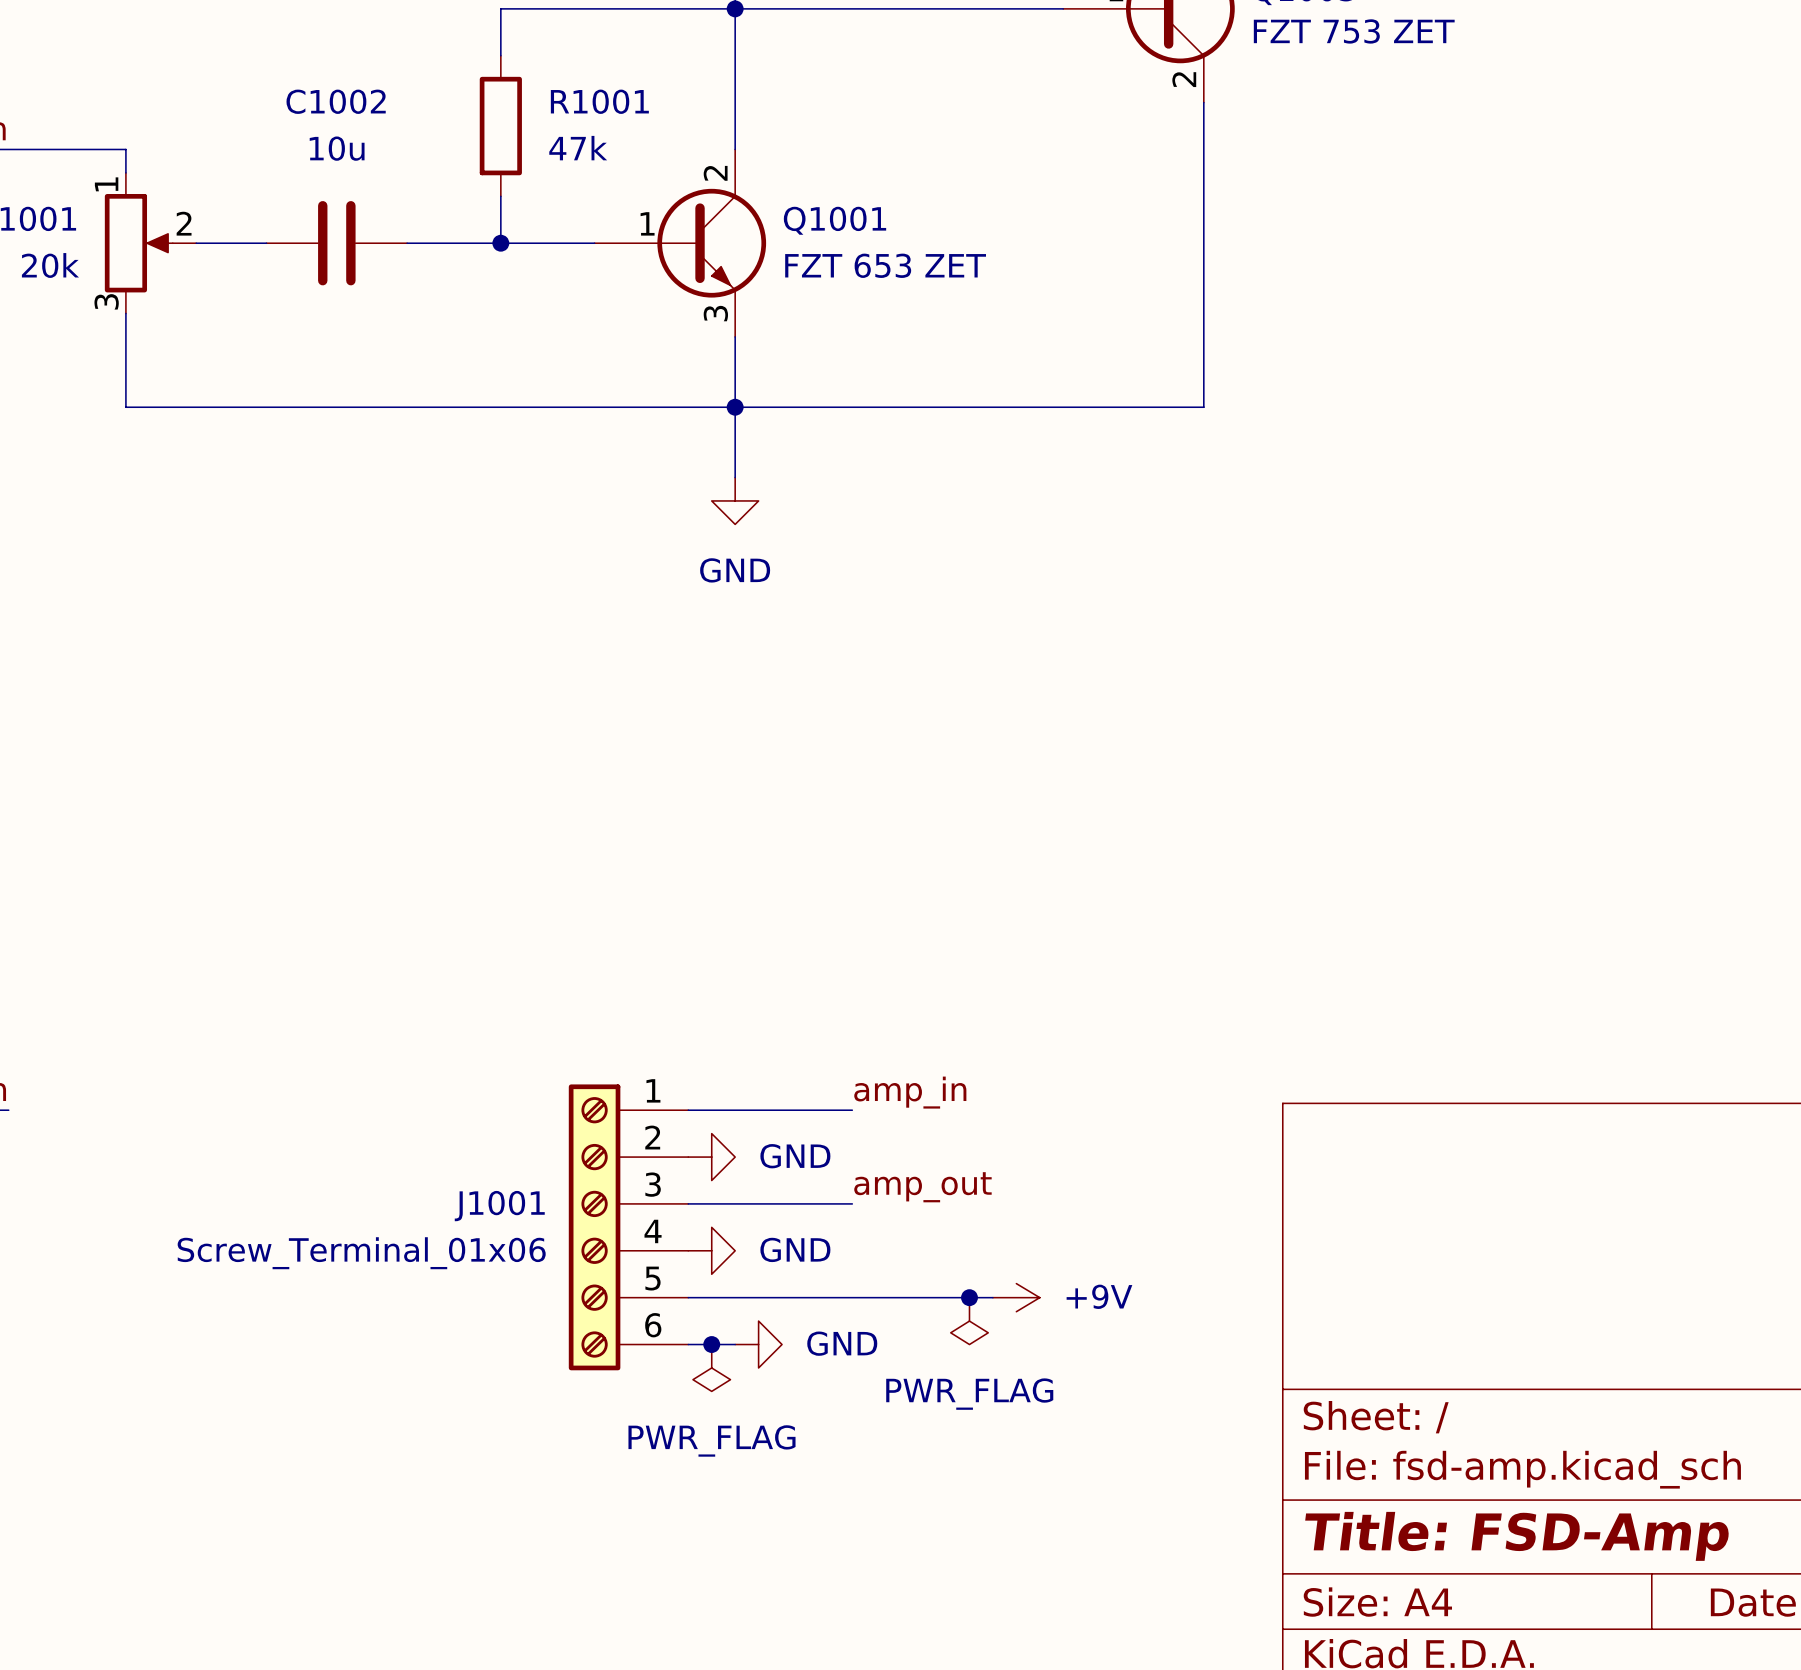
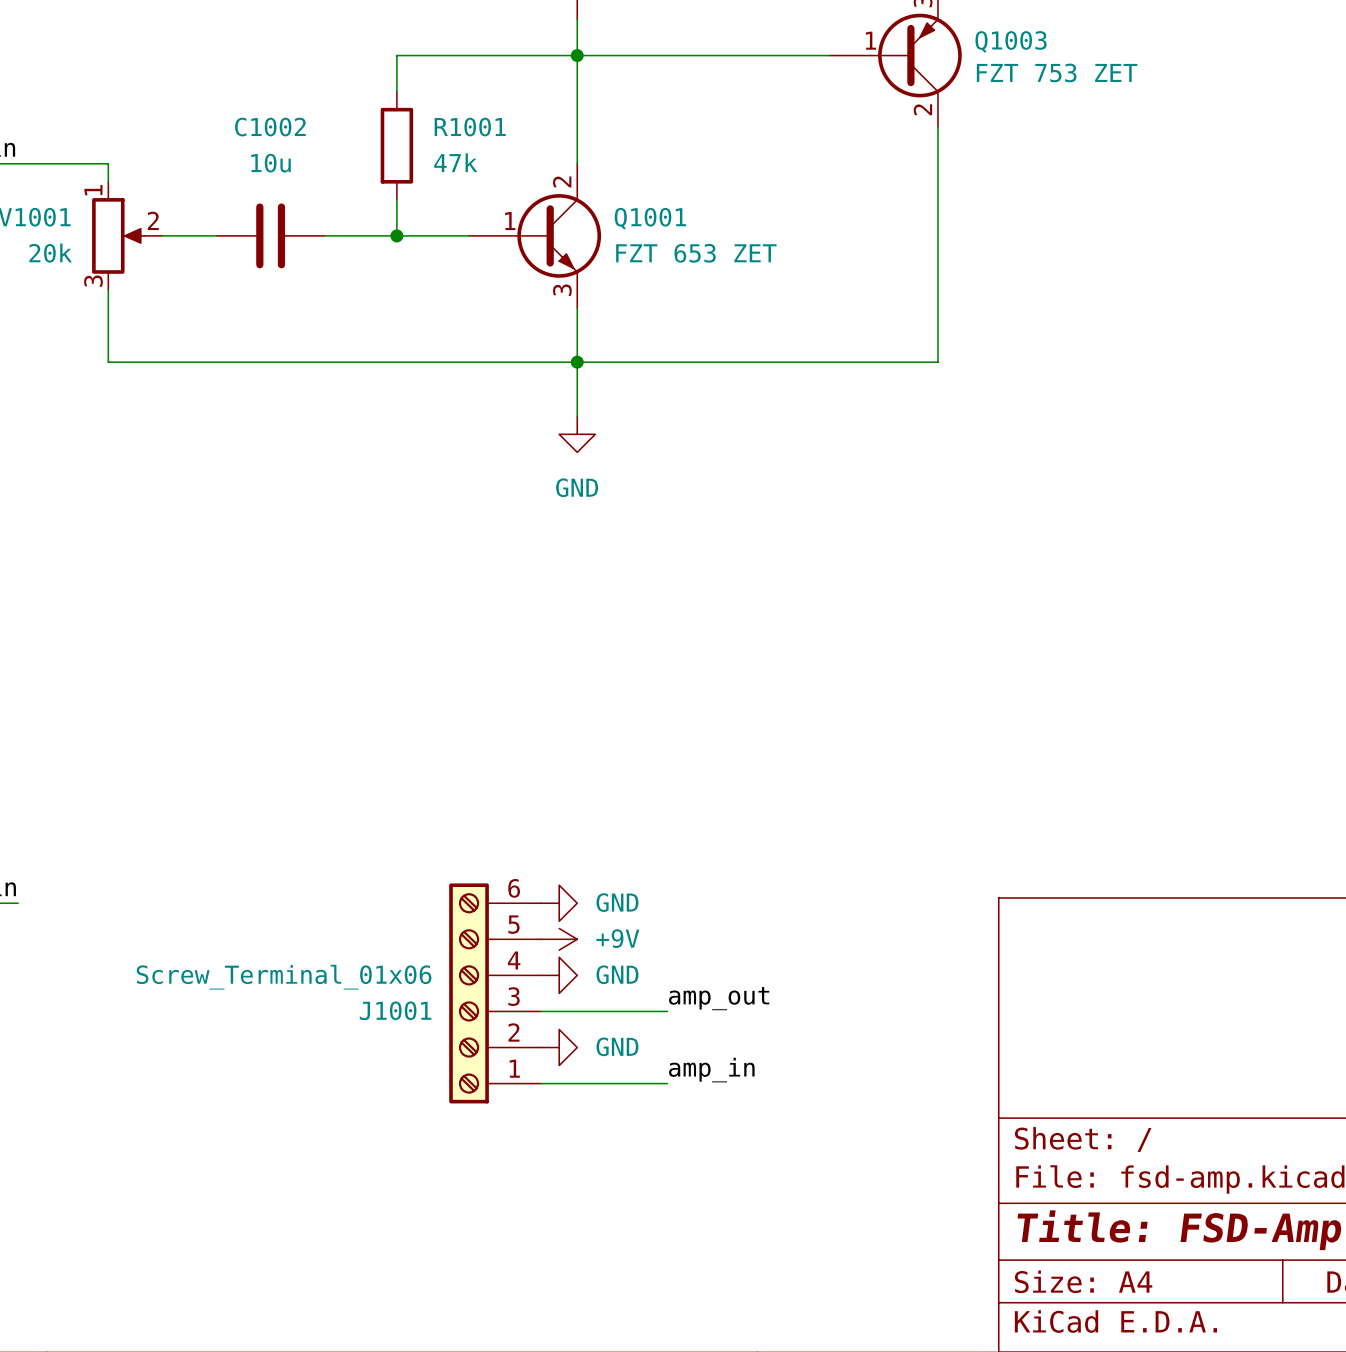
label position: amp_in (910, 1092) -> amp_in (711, 1070)
wire: (688, 1110) (852, 1110) -> none
power symbol: none -> GND (559, 903)
power symbol: GND (711, 1157) -> +9V (559, 939)
label position: amp_out (922, 1187) -> amp_out (719, 998)
wire: (688, 1203) (852, 1203) -> (541, 1011) (667, 1011)
power symbol: none -> GND (559, 975)
J1001 flip: as is (594, 1227) -> up-down (469, 993)
power symbol: GND (711, 1250) -> none
wire: (688, 1297) (992, 1297) -> none
power symbol: none -> GND (559, 1047)
junction: (969, 1297) -> none
power symbol: +9V (1016, 1297) -> none
power symbol: PWR_FLAG (969, 1321) -> none
junction: (711, 1344) -> none
wire: none -> (577, 1083) (667, 1083)
power symbol: GND (758, 1344) -> none
power symbol: PWR_FLAG (711, 1367) -> none

